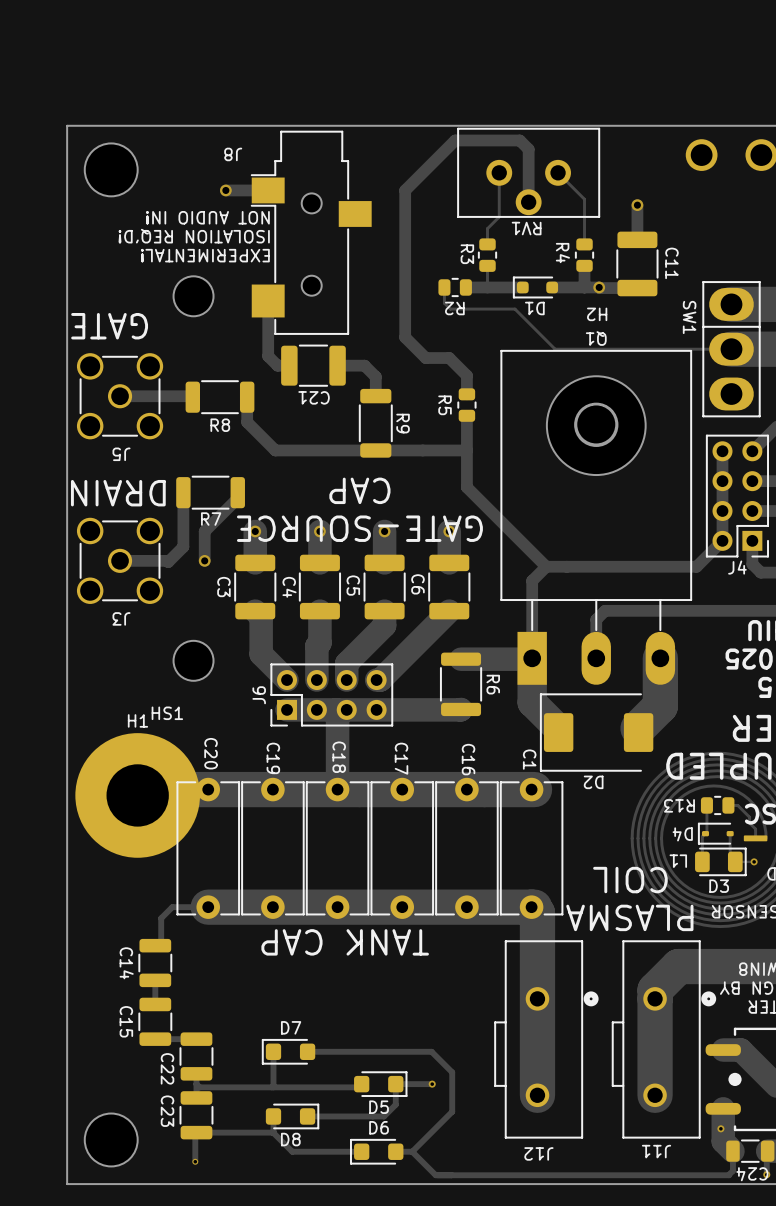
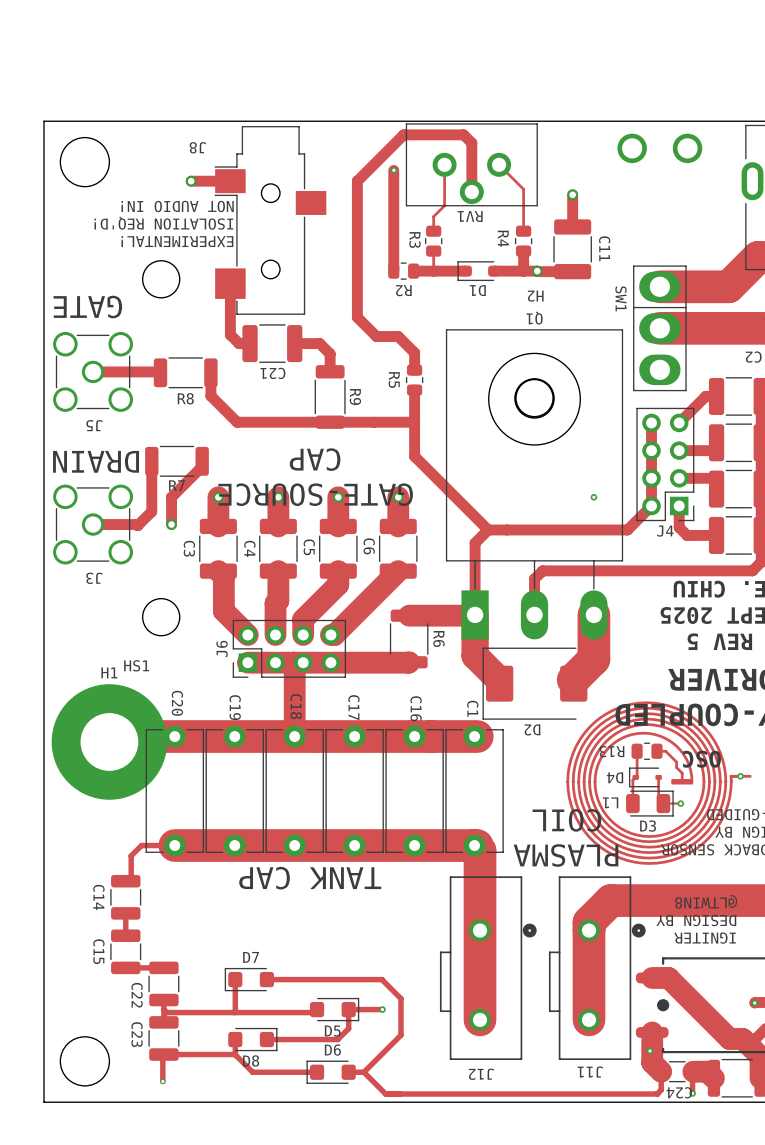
via: none -> (393, 170)
track: (444, 287) (444, 303) (450, 309) (514, 309) (555, 349) (731, 349) -> (393, 271) (393, 170)
via: none -> (593, 497)

